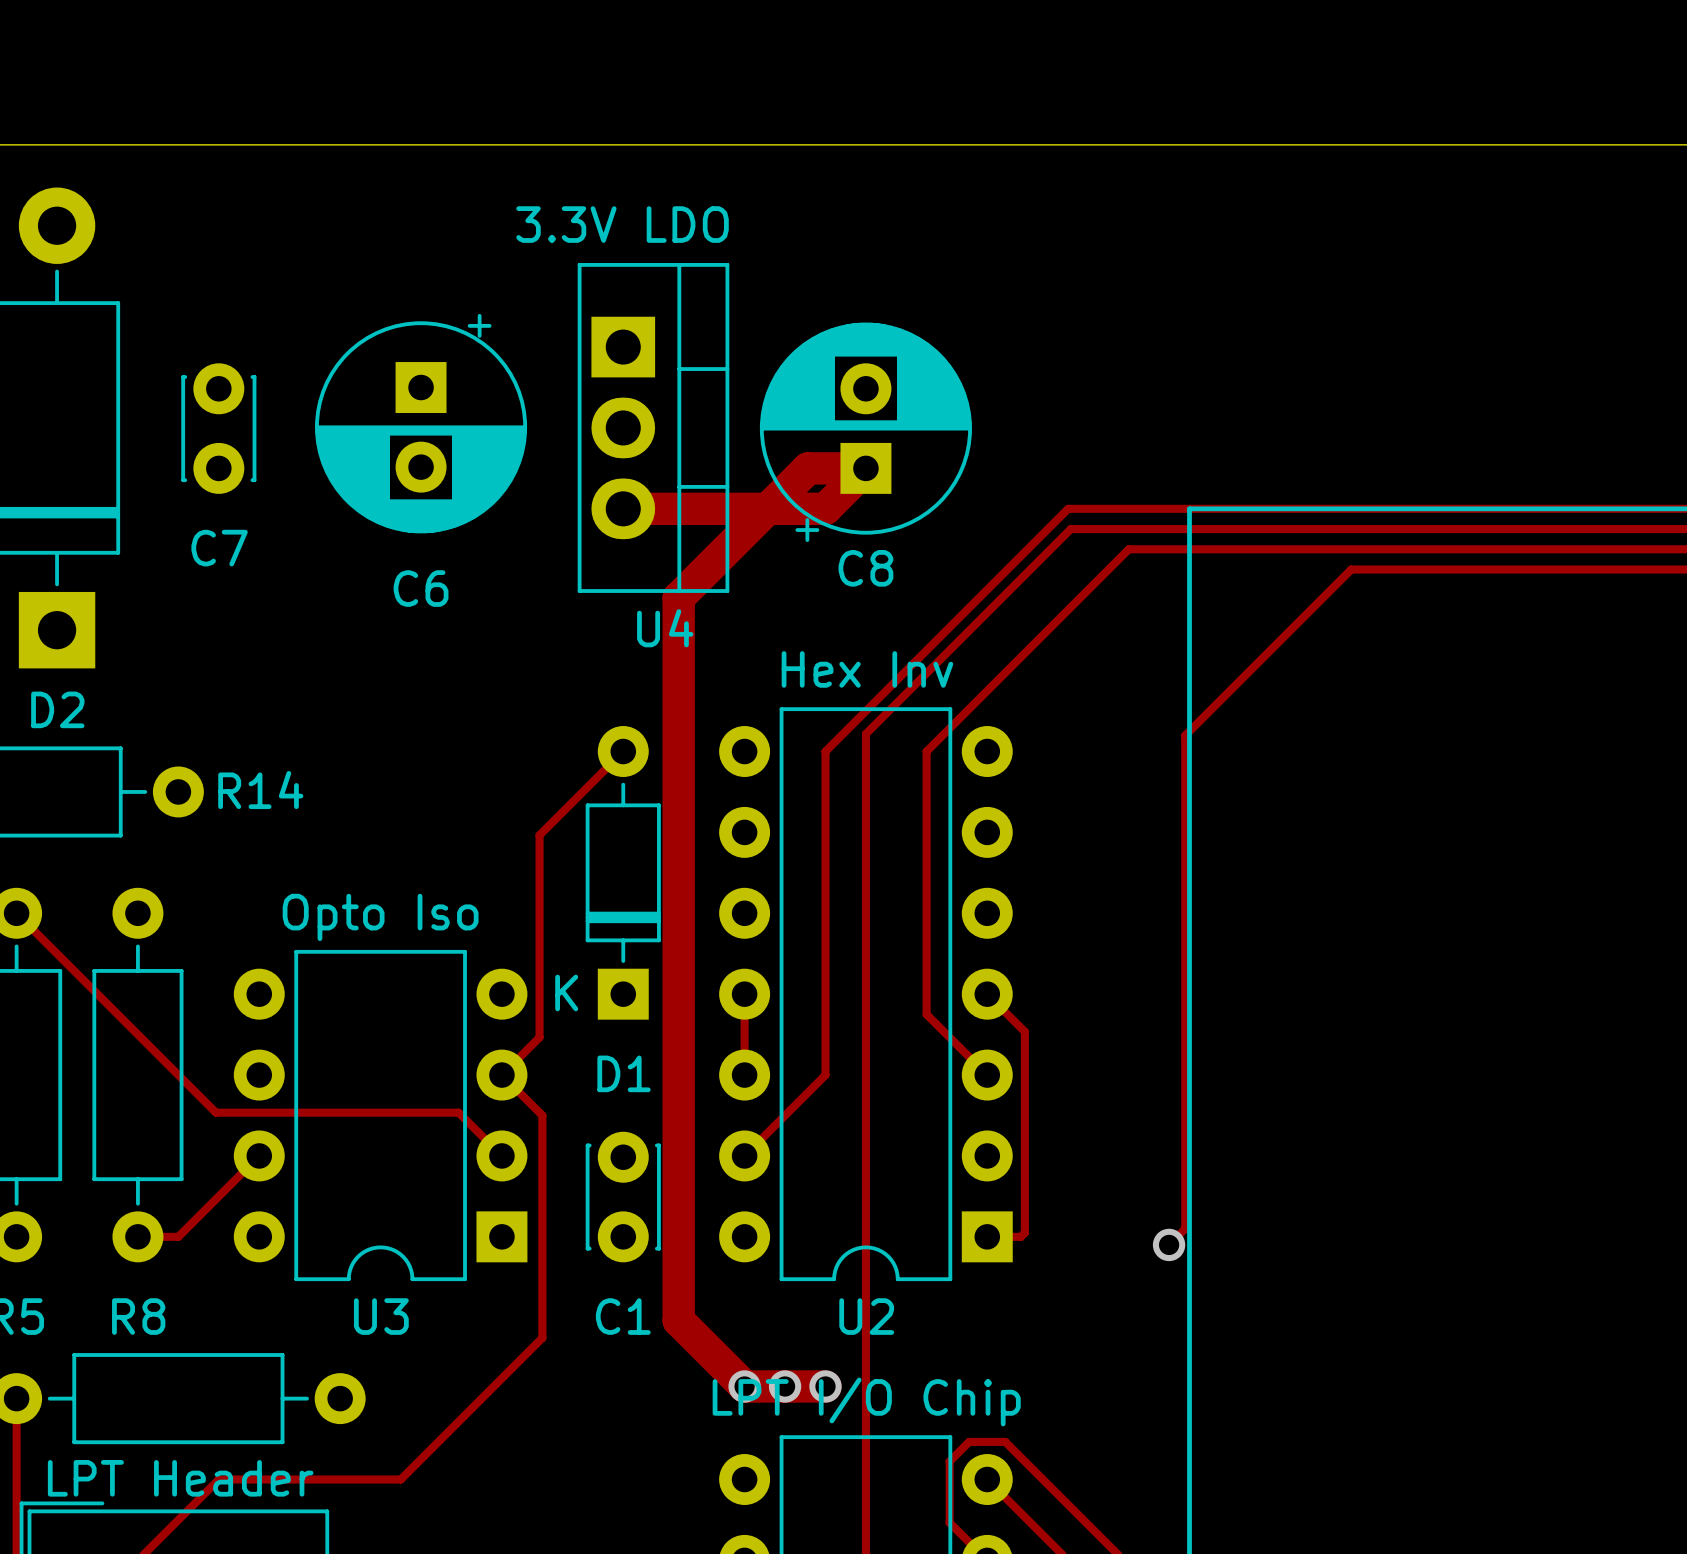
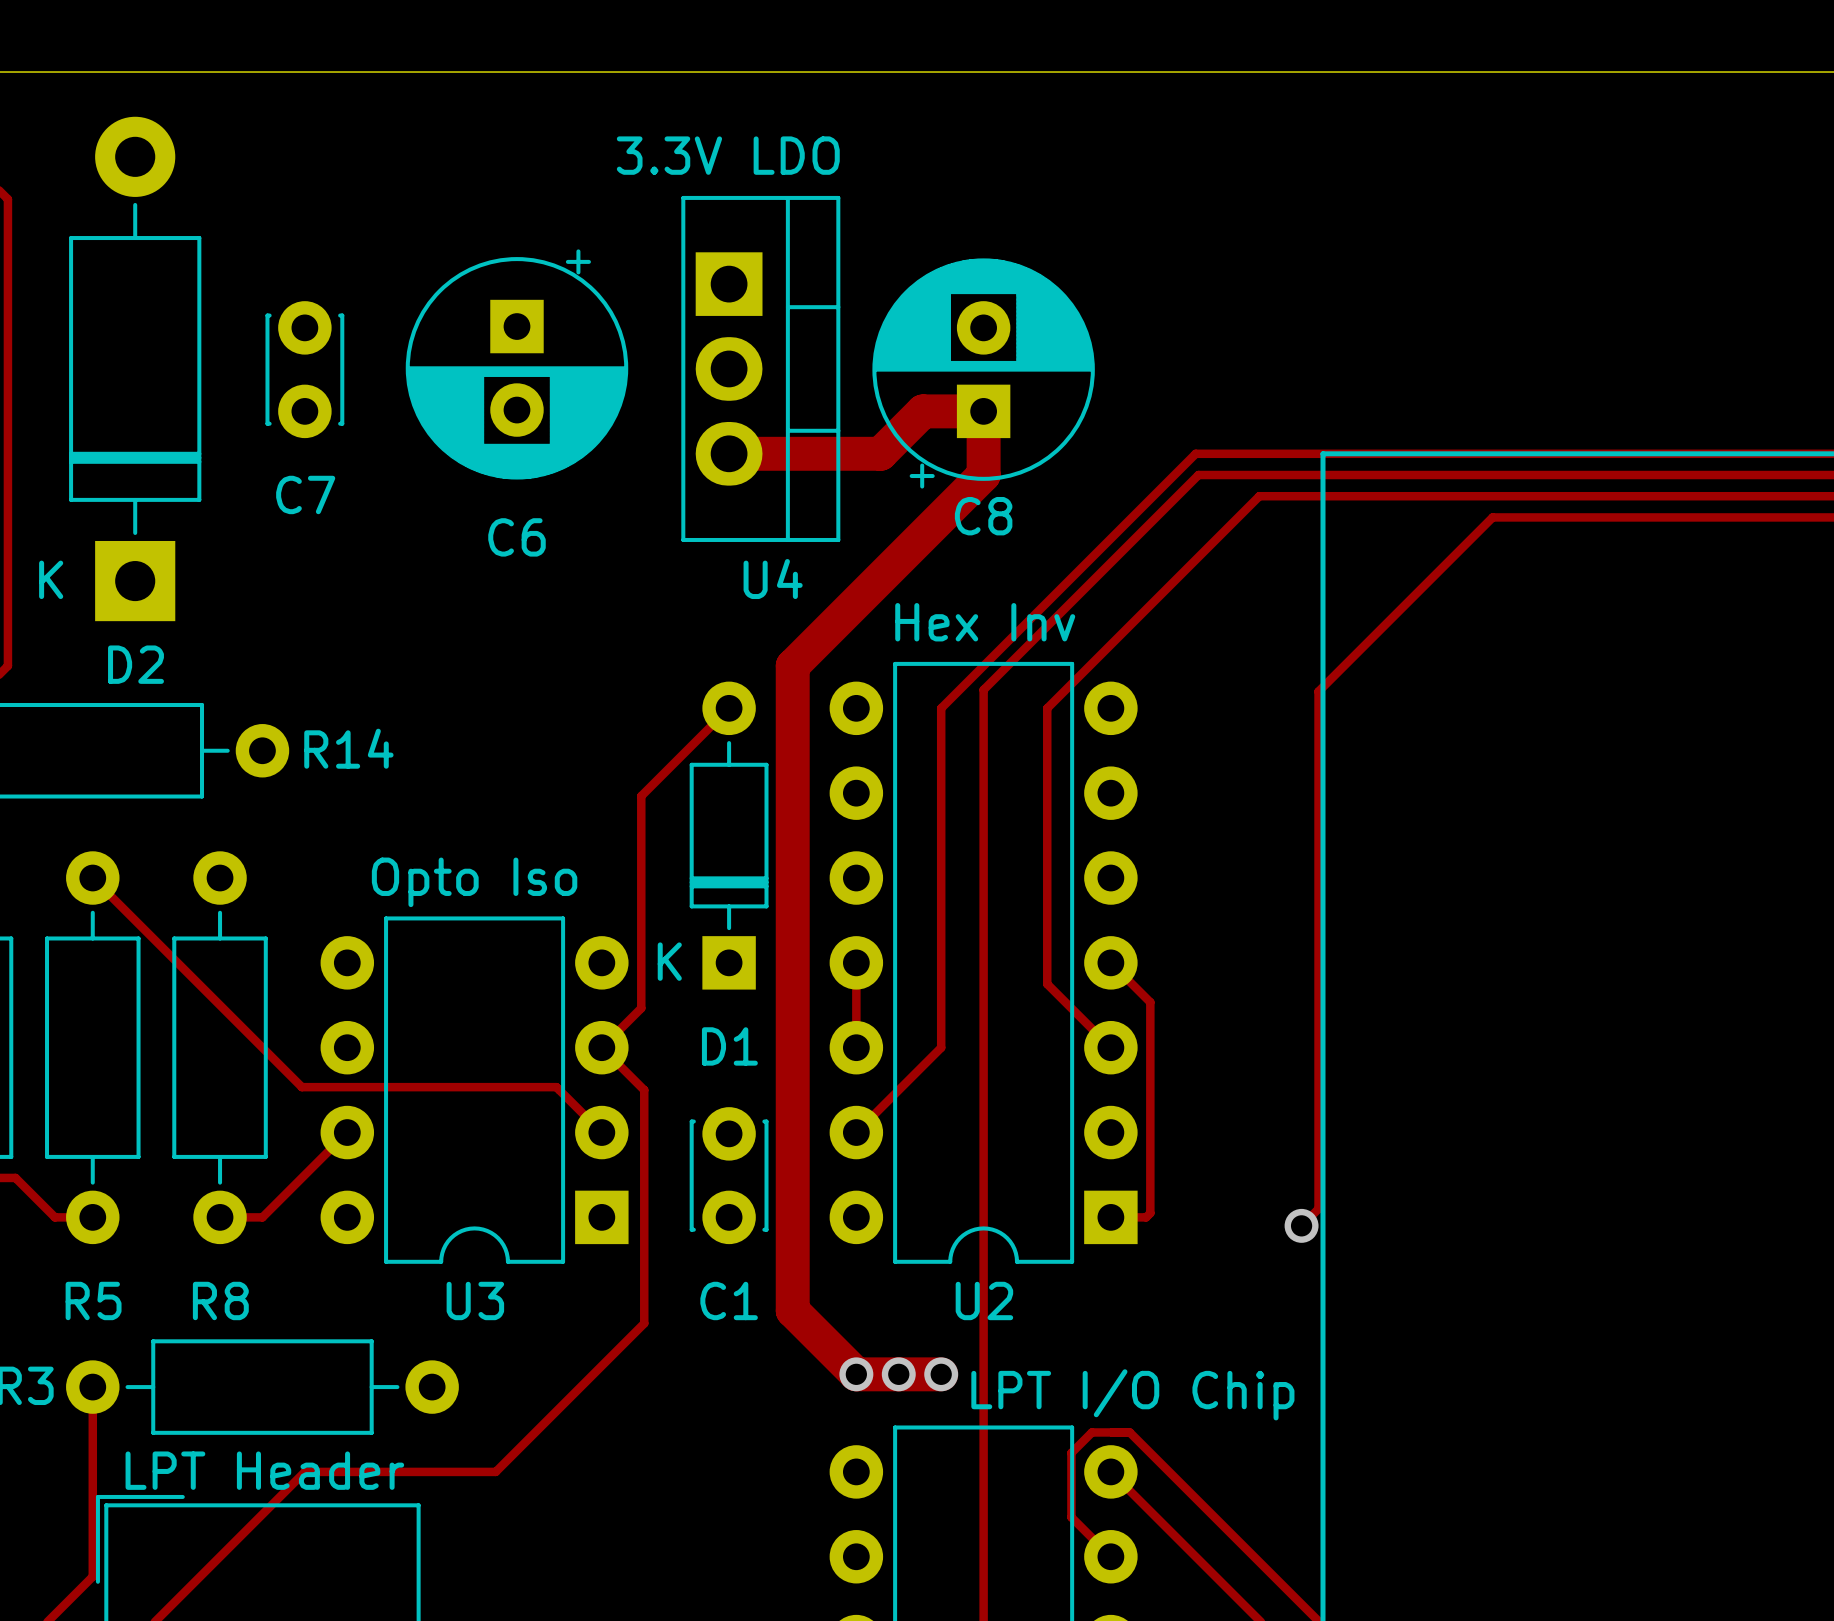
track: (865, 468) (825, 508) (767, 508) (678, 597) (678, 1320) (683, 1325) -> (983, 411) (983, 475) (792, 665) (792, 1310)
text position: LPT I/O Chip (866, 1401) -> LPT I/O Chip (1132, 1394)

